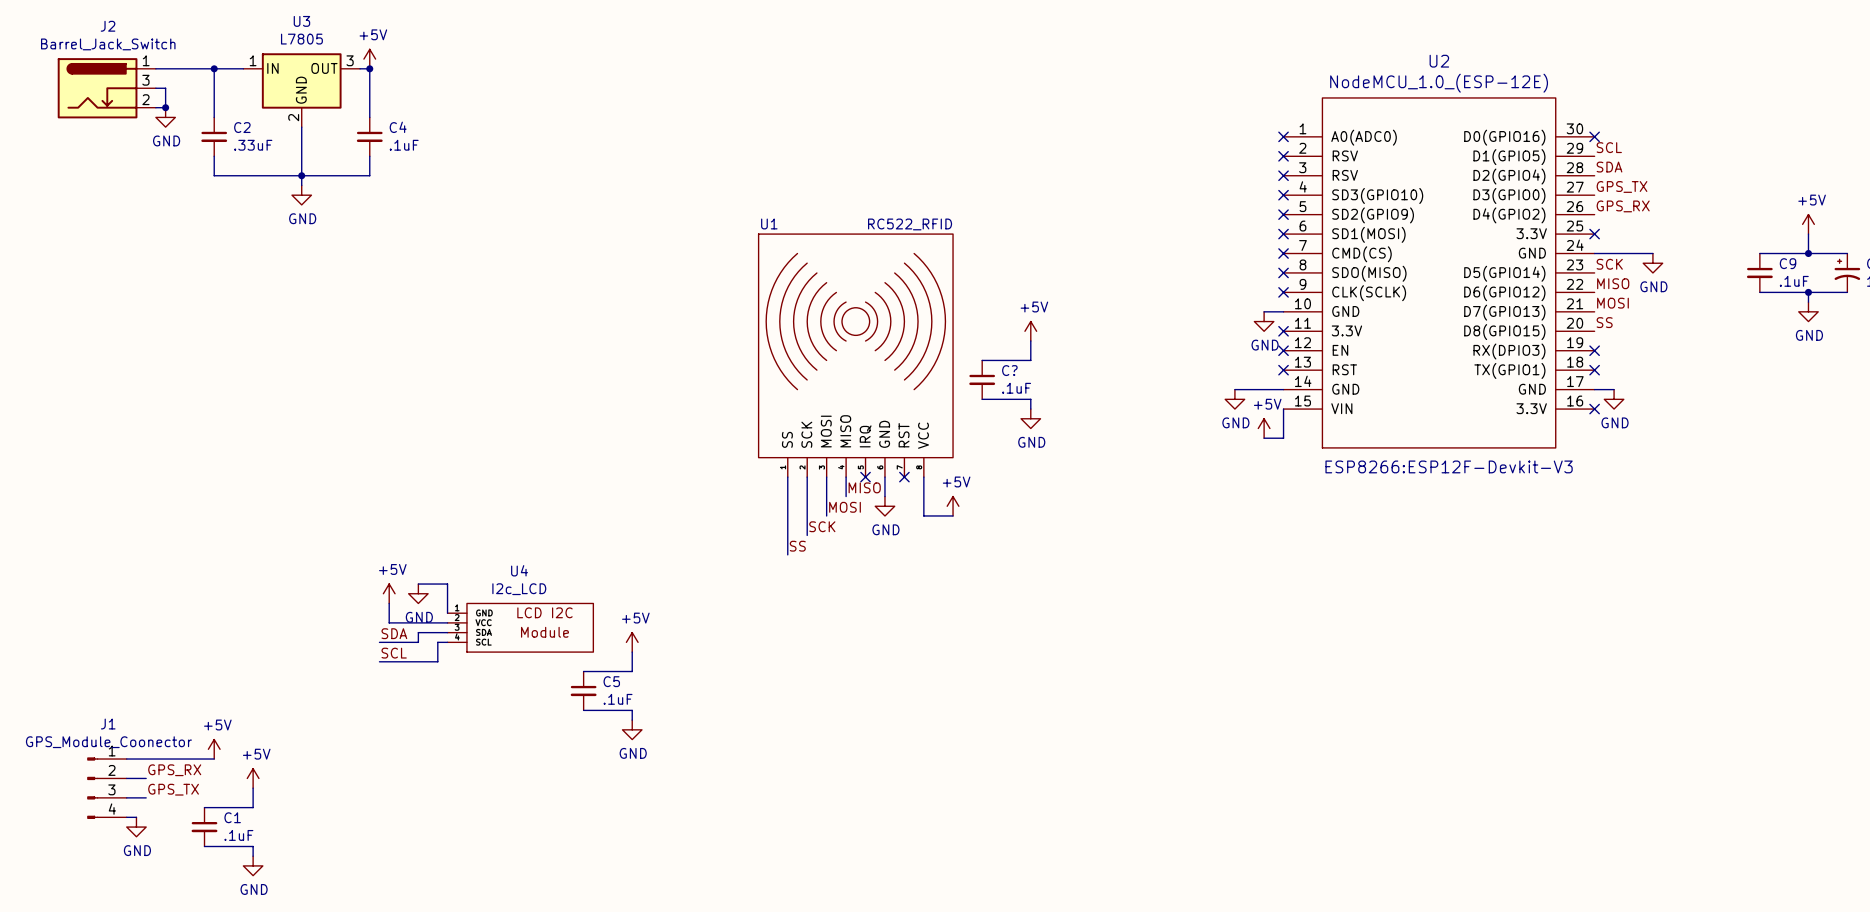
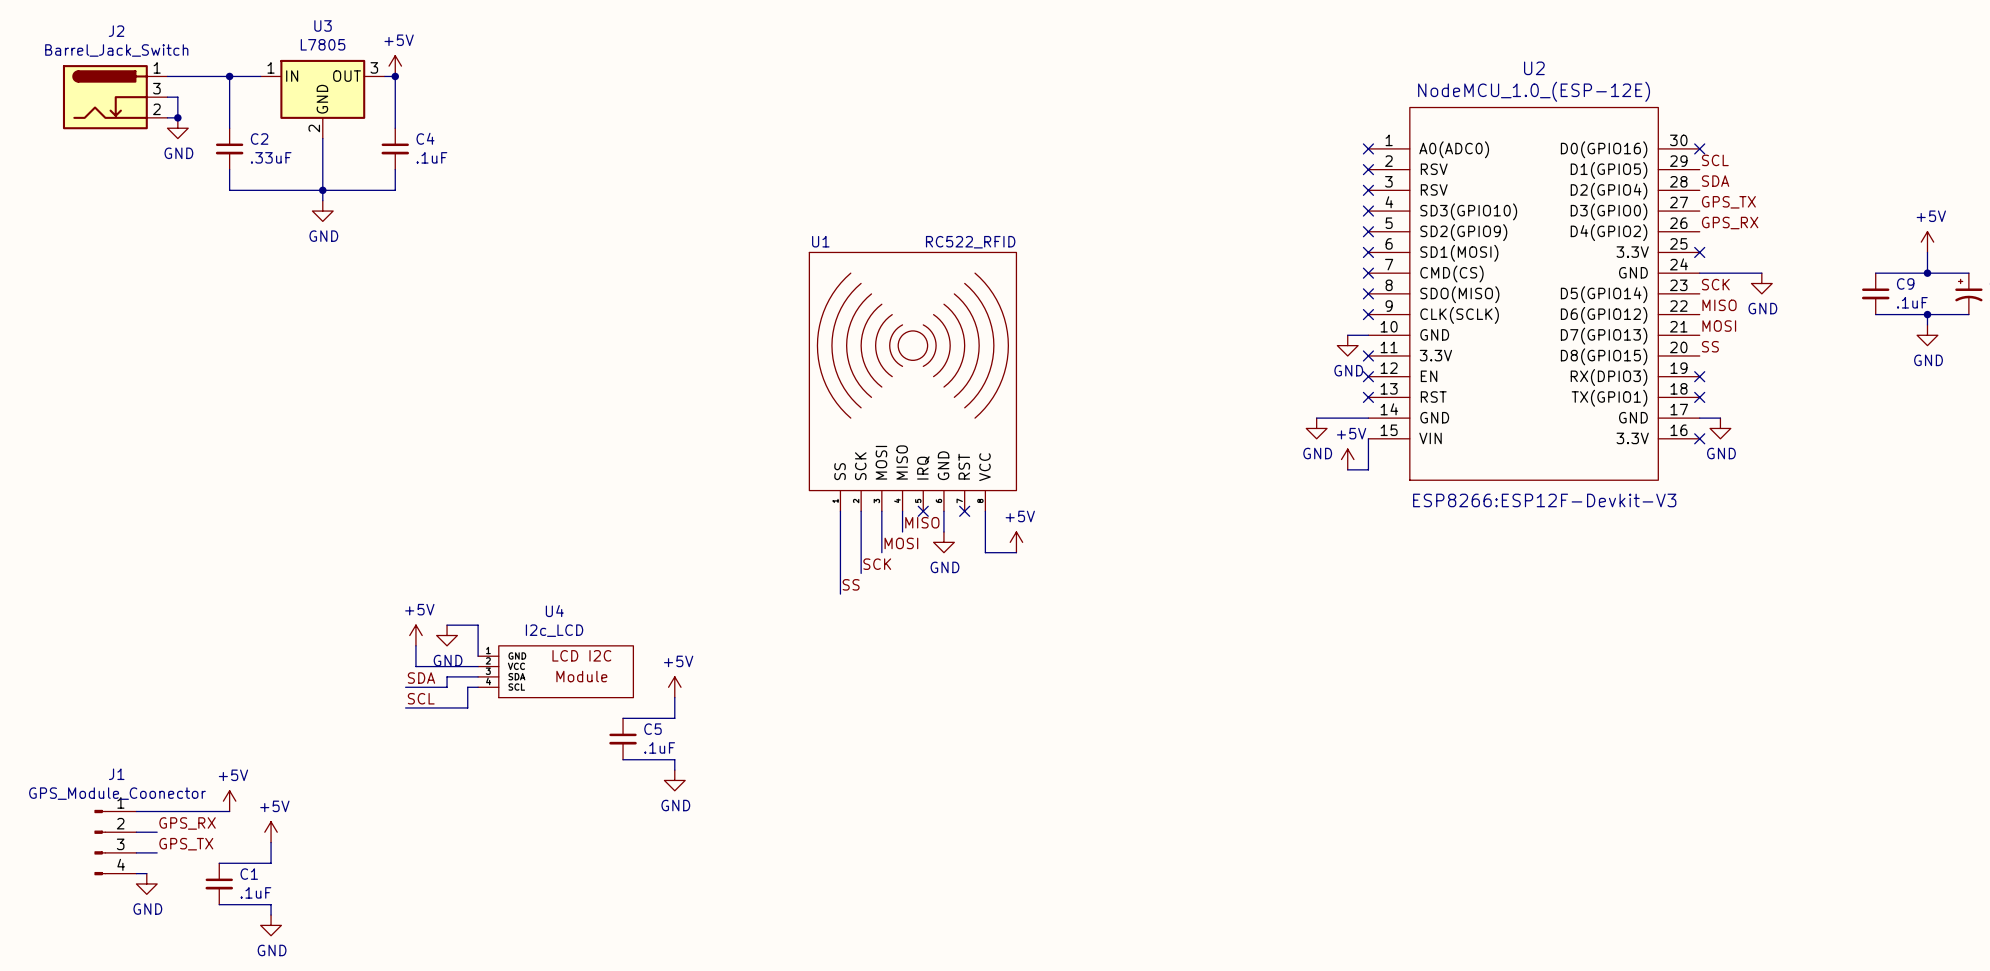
power symbol: +5V (1030, 331) -> none
wire: (1030, 341) (1030, 360) (982, 360) -> none
C?: .1uF (982, 379) -> none
wire: (982, 399) (1030, 399) (1030, 409) -> none
power symbol: GND (1030, 418) -> none

